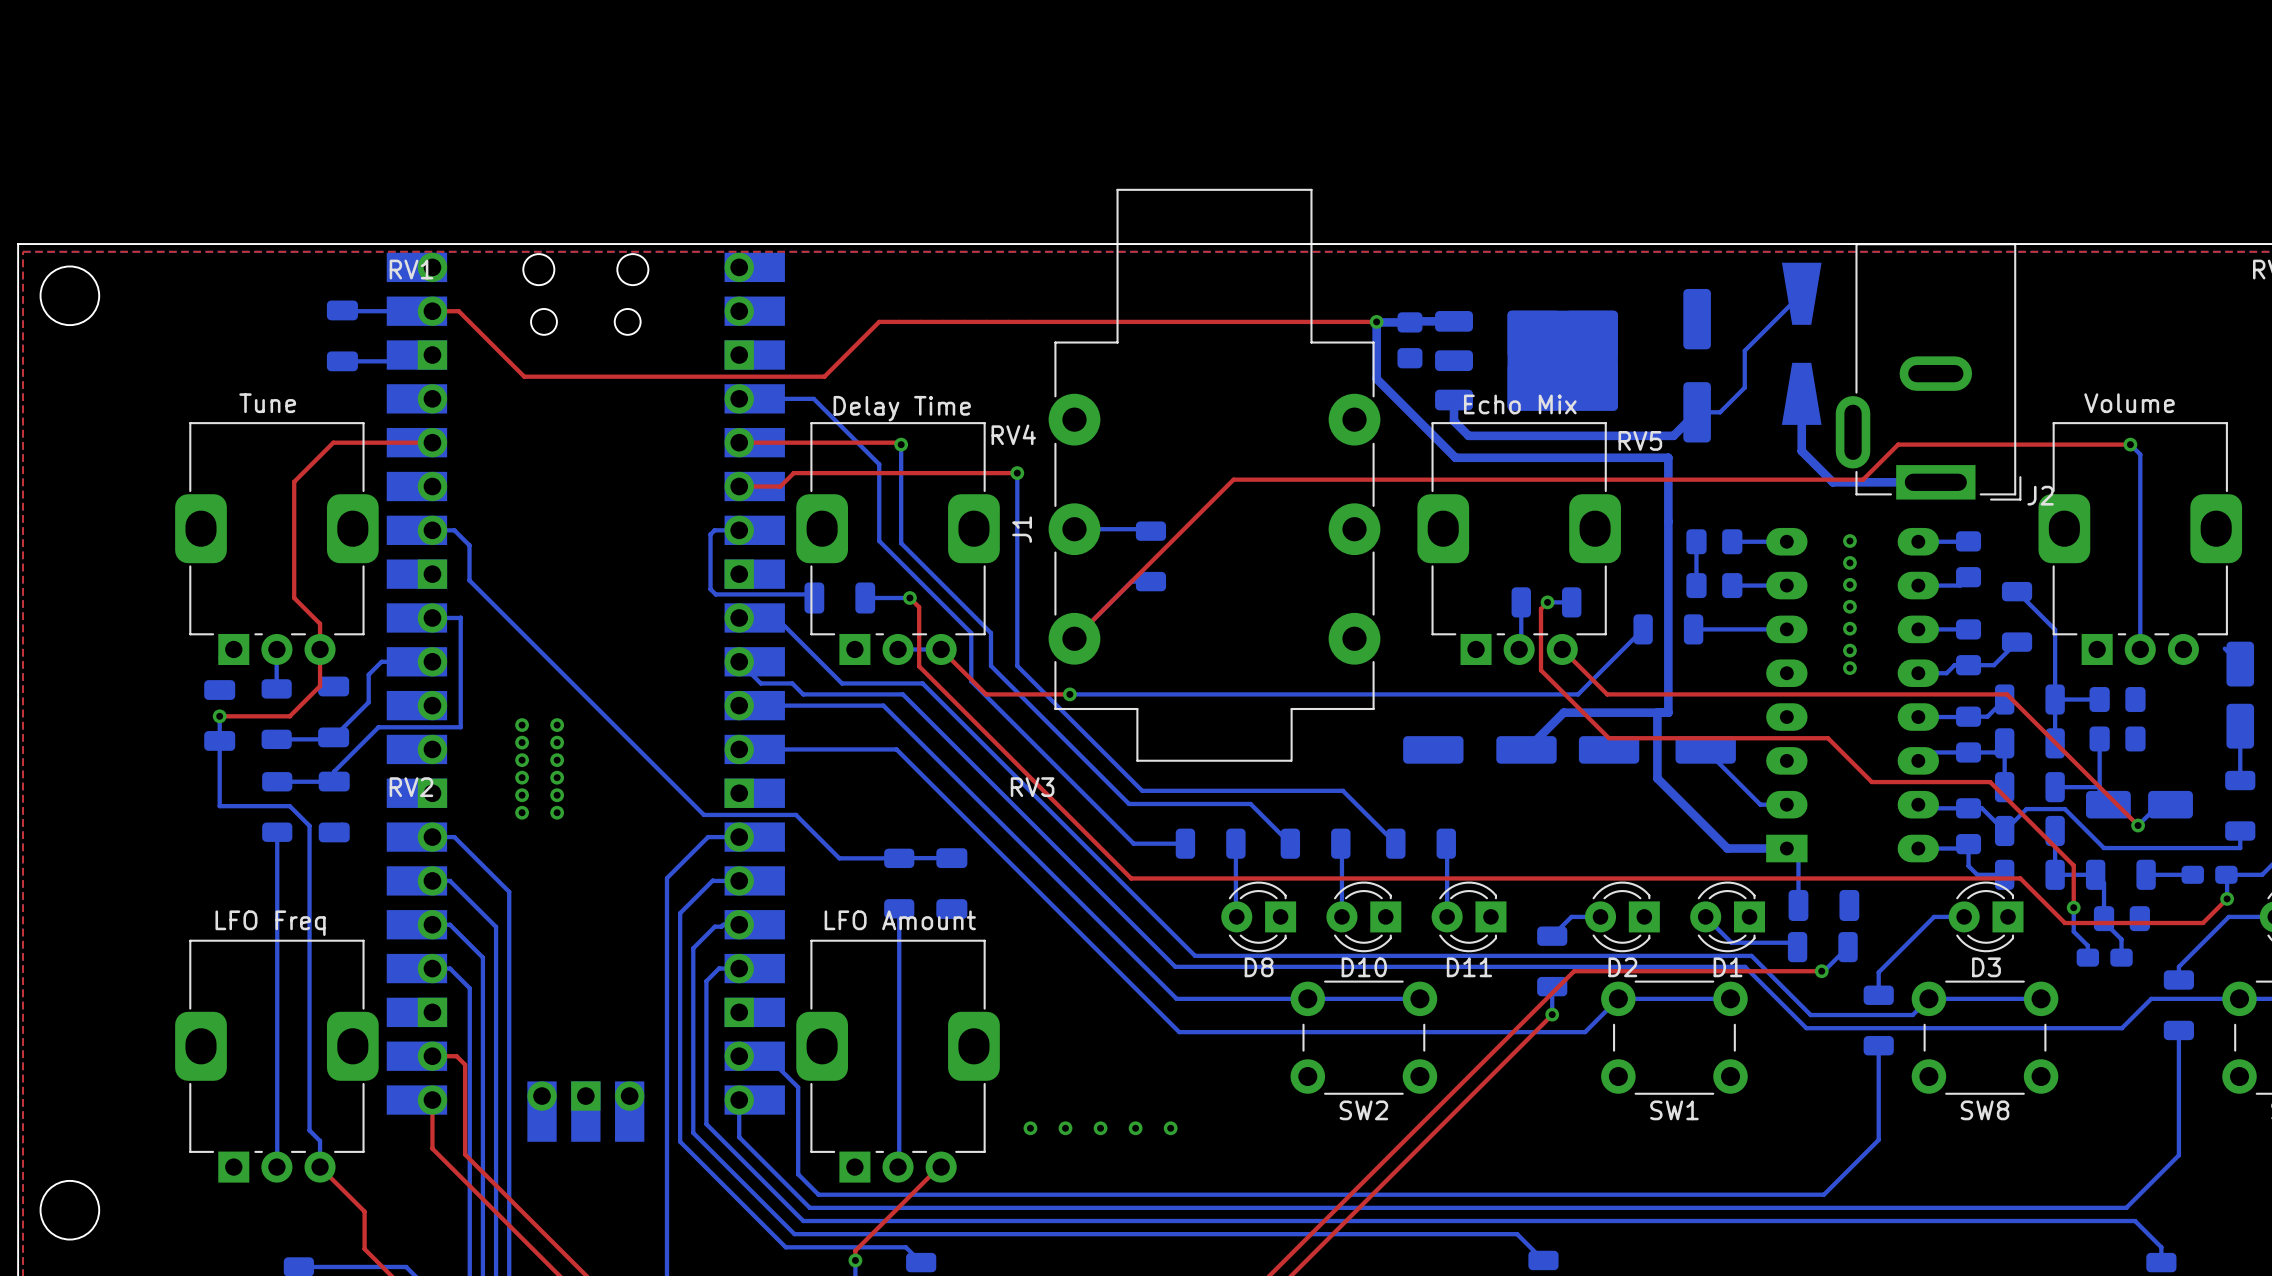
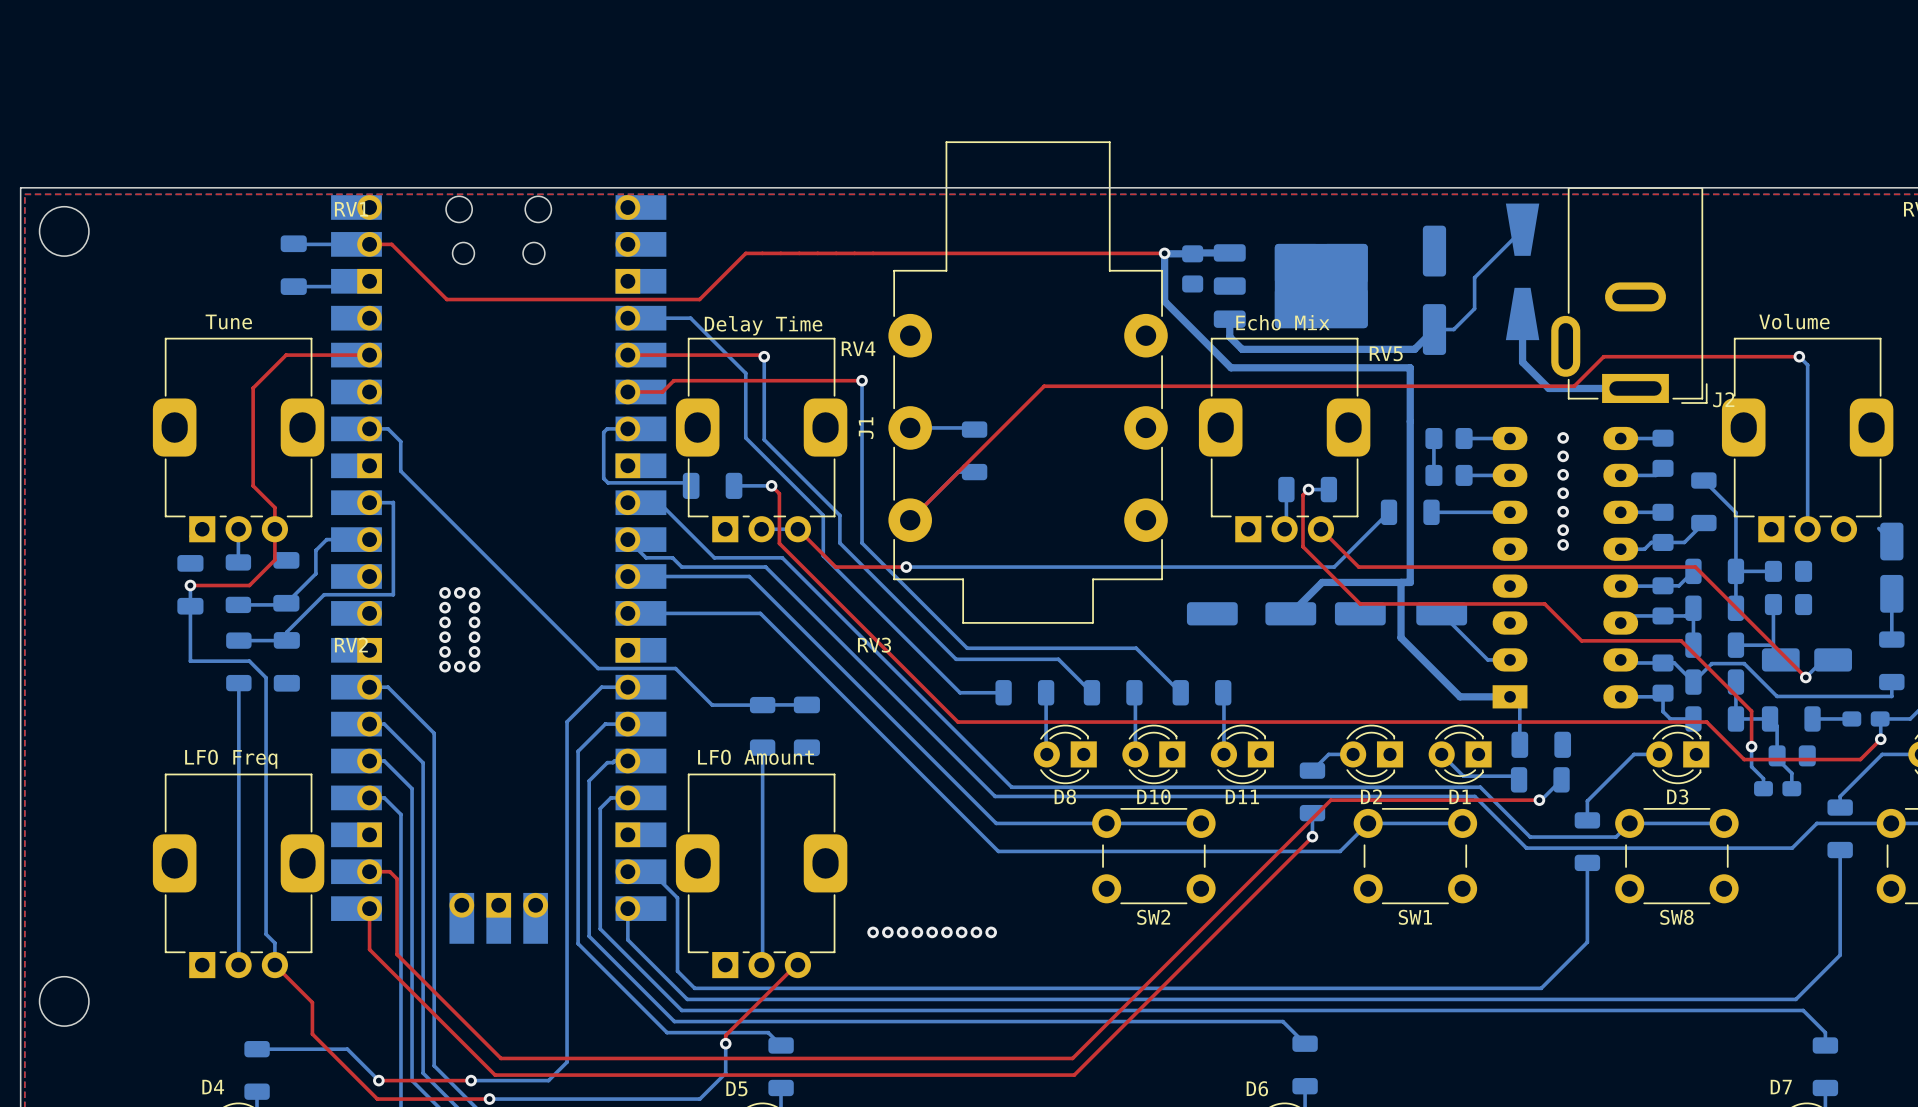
via: none -> (459, 592)
via: none -> (459, 666)
via: none -> (887, 932)
via: none -> (917, 932)
via: none -> (946, 932)
via: none -> (976, 932)

